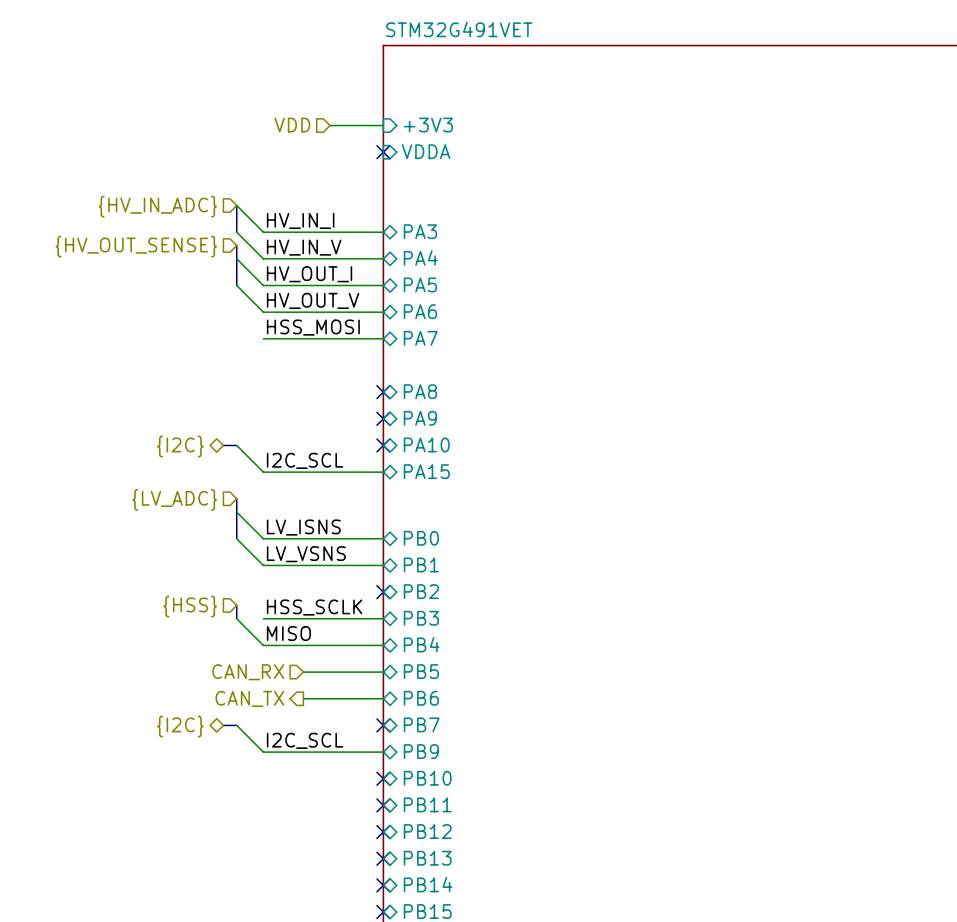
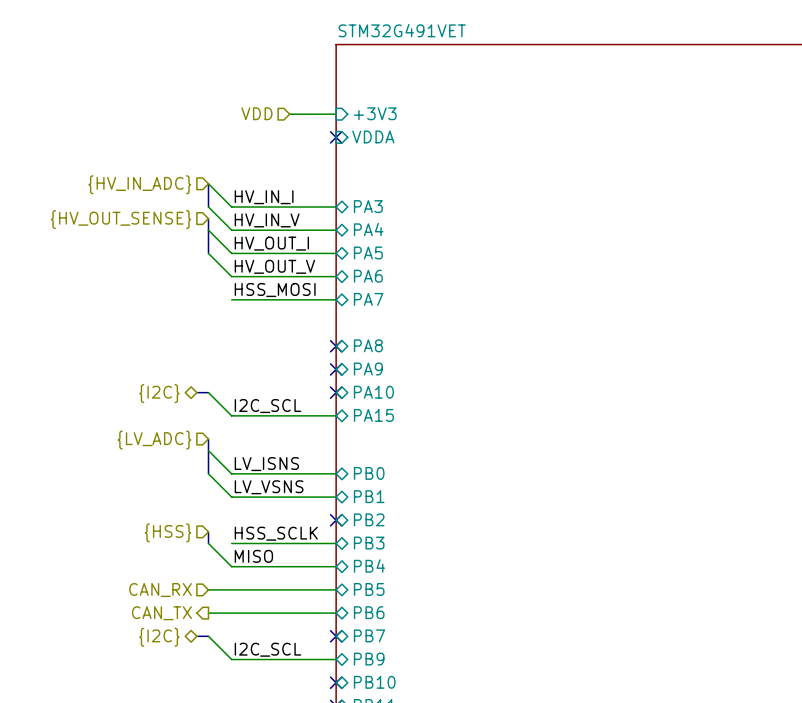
wire: none -> (208, 589) (266, 589)
hierarchical label position: CAN_RX (248, 672) -> CAN_RX (160, 590)
wire: none -> (208, 613) (266, 613)
hierarchical label position: CAN_TX (249, 698) -> CAN_TX (161, 613)

